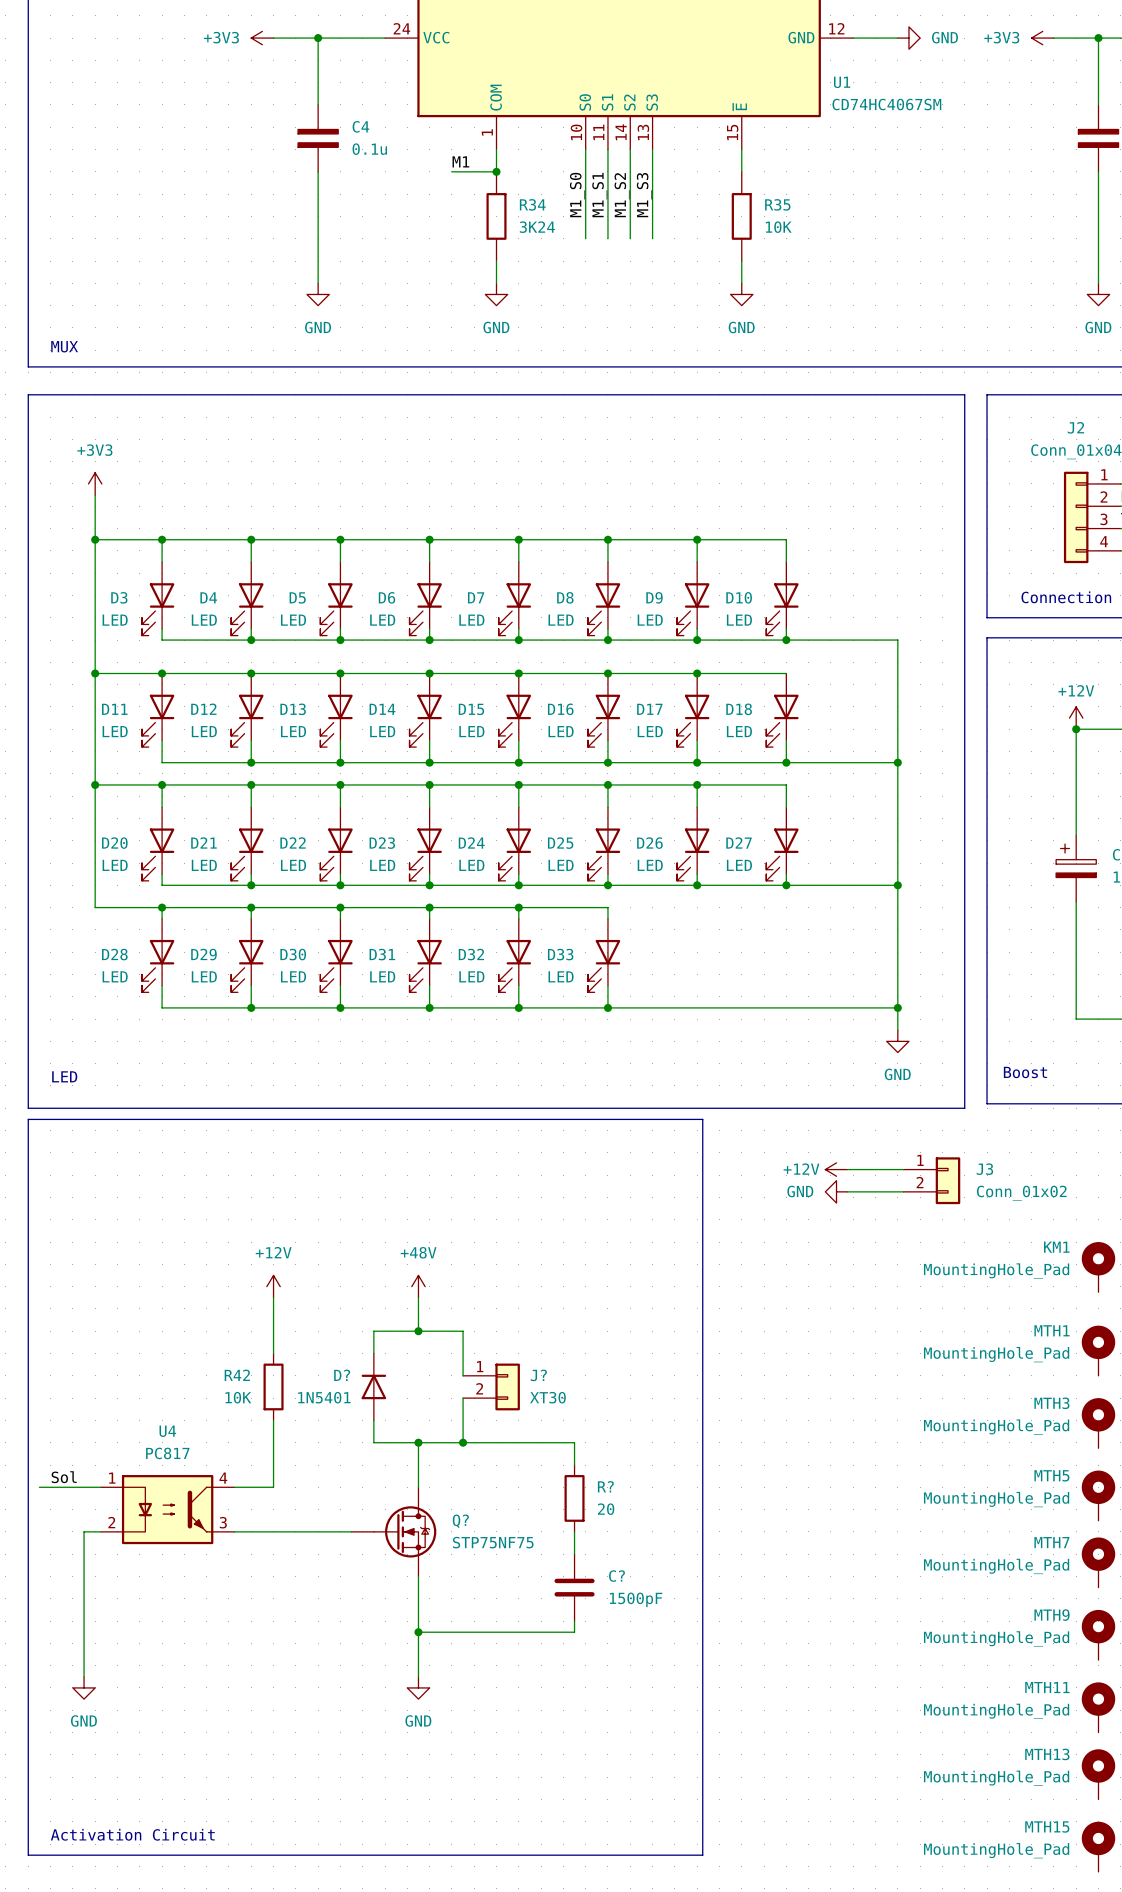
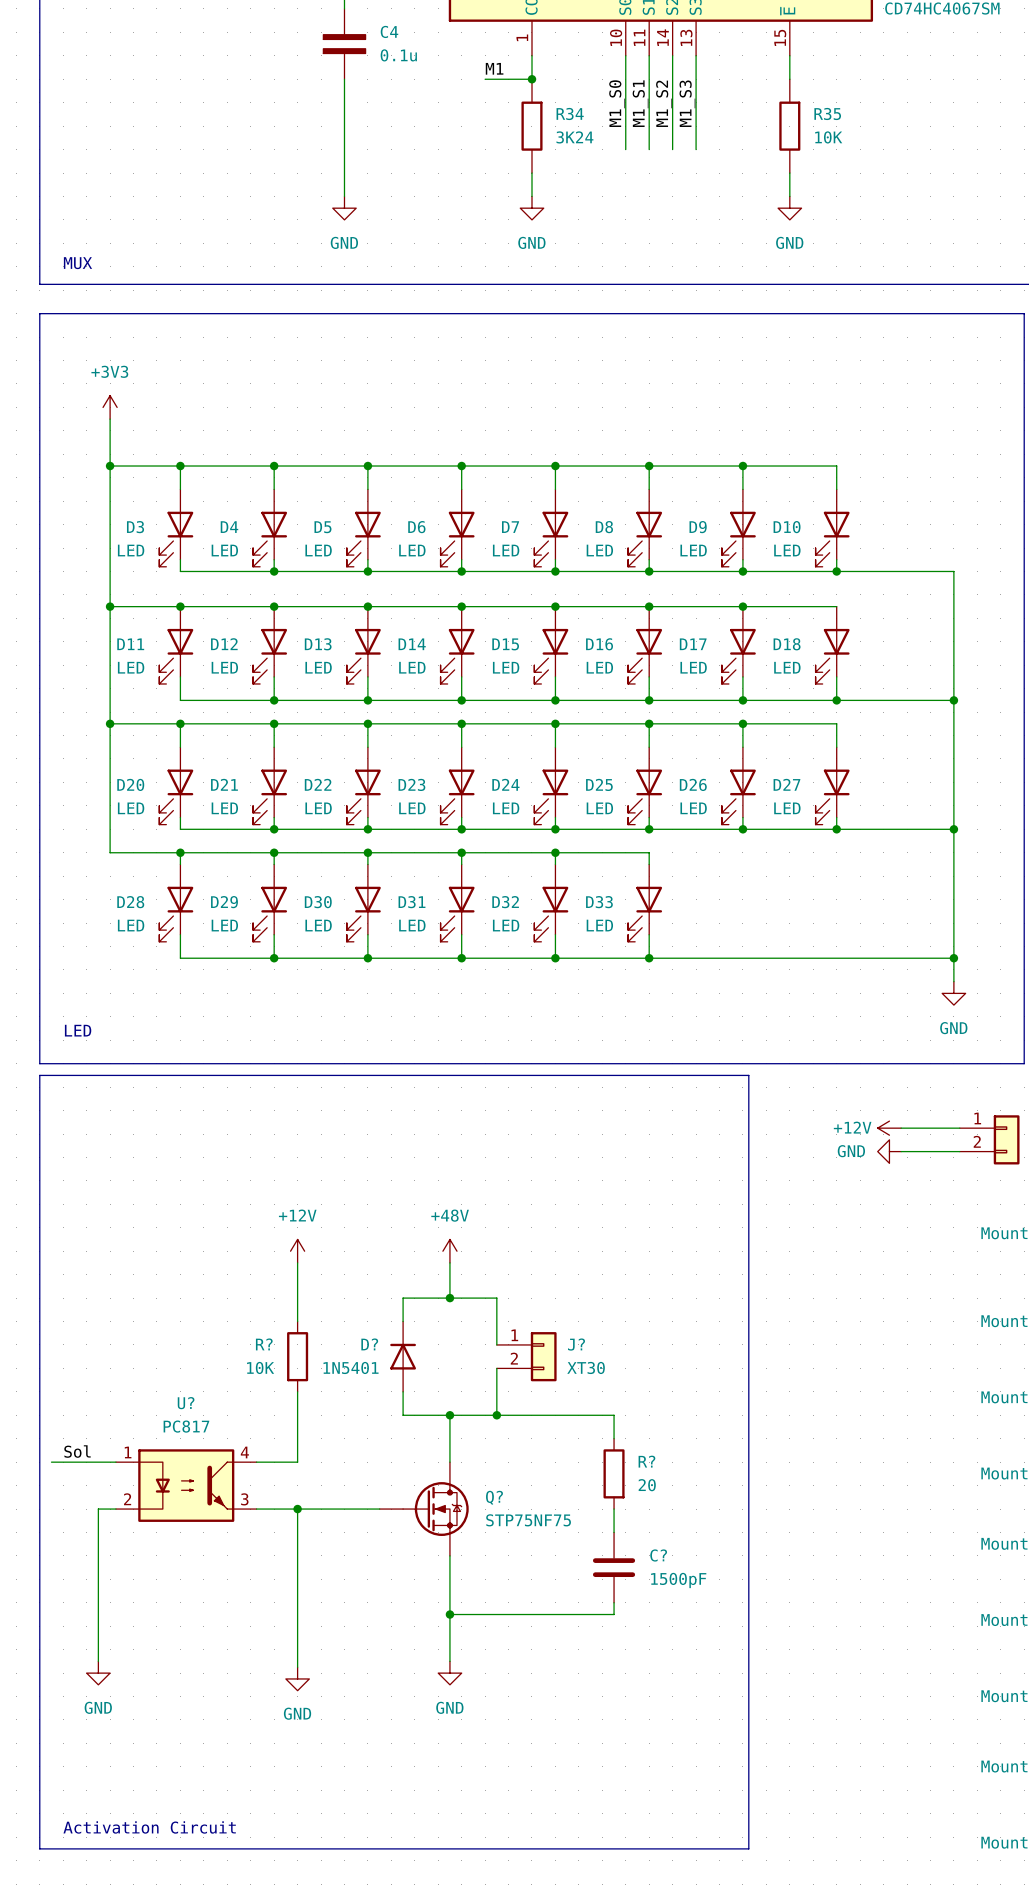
R42 name: R42 (237, 1375) -> R? (264, 1344)
U4 name: U4 (167, 1431) -> U? (186, 1403)
wire: none -> (297, 1509) (297, 1667)
junction: none -> (297, 1509)
power symbol: none -> GND (297, 1678)

